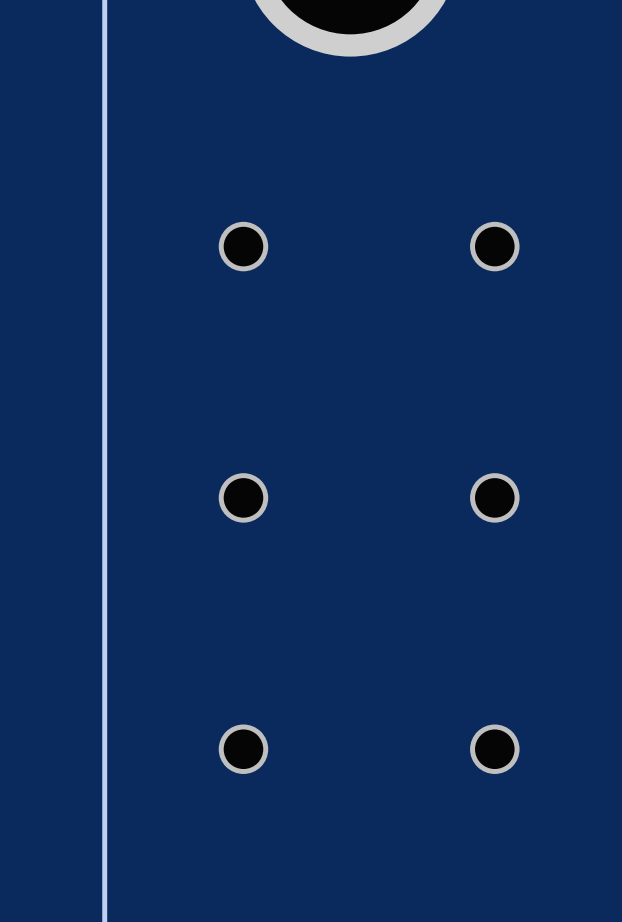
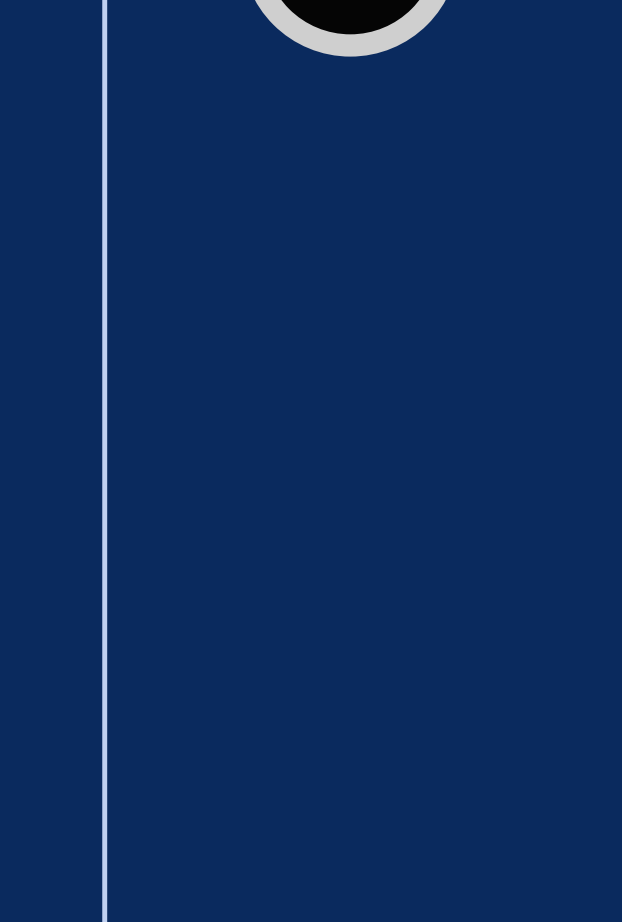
via: (243, 246) -> none
via: (494, 246) -> none
via: (243, 497) -> none
via: (494, 497) -> none
via: (243, 749) -> none
via: (494, 749) -> none

